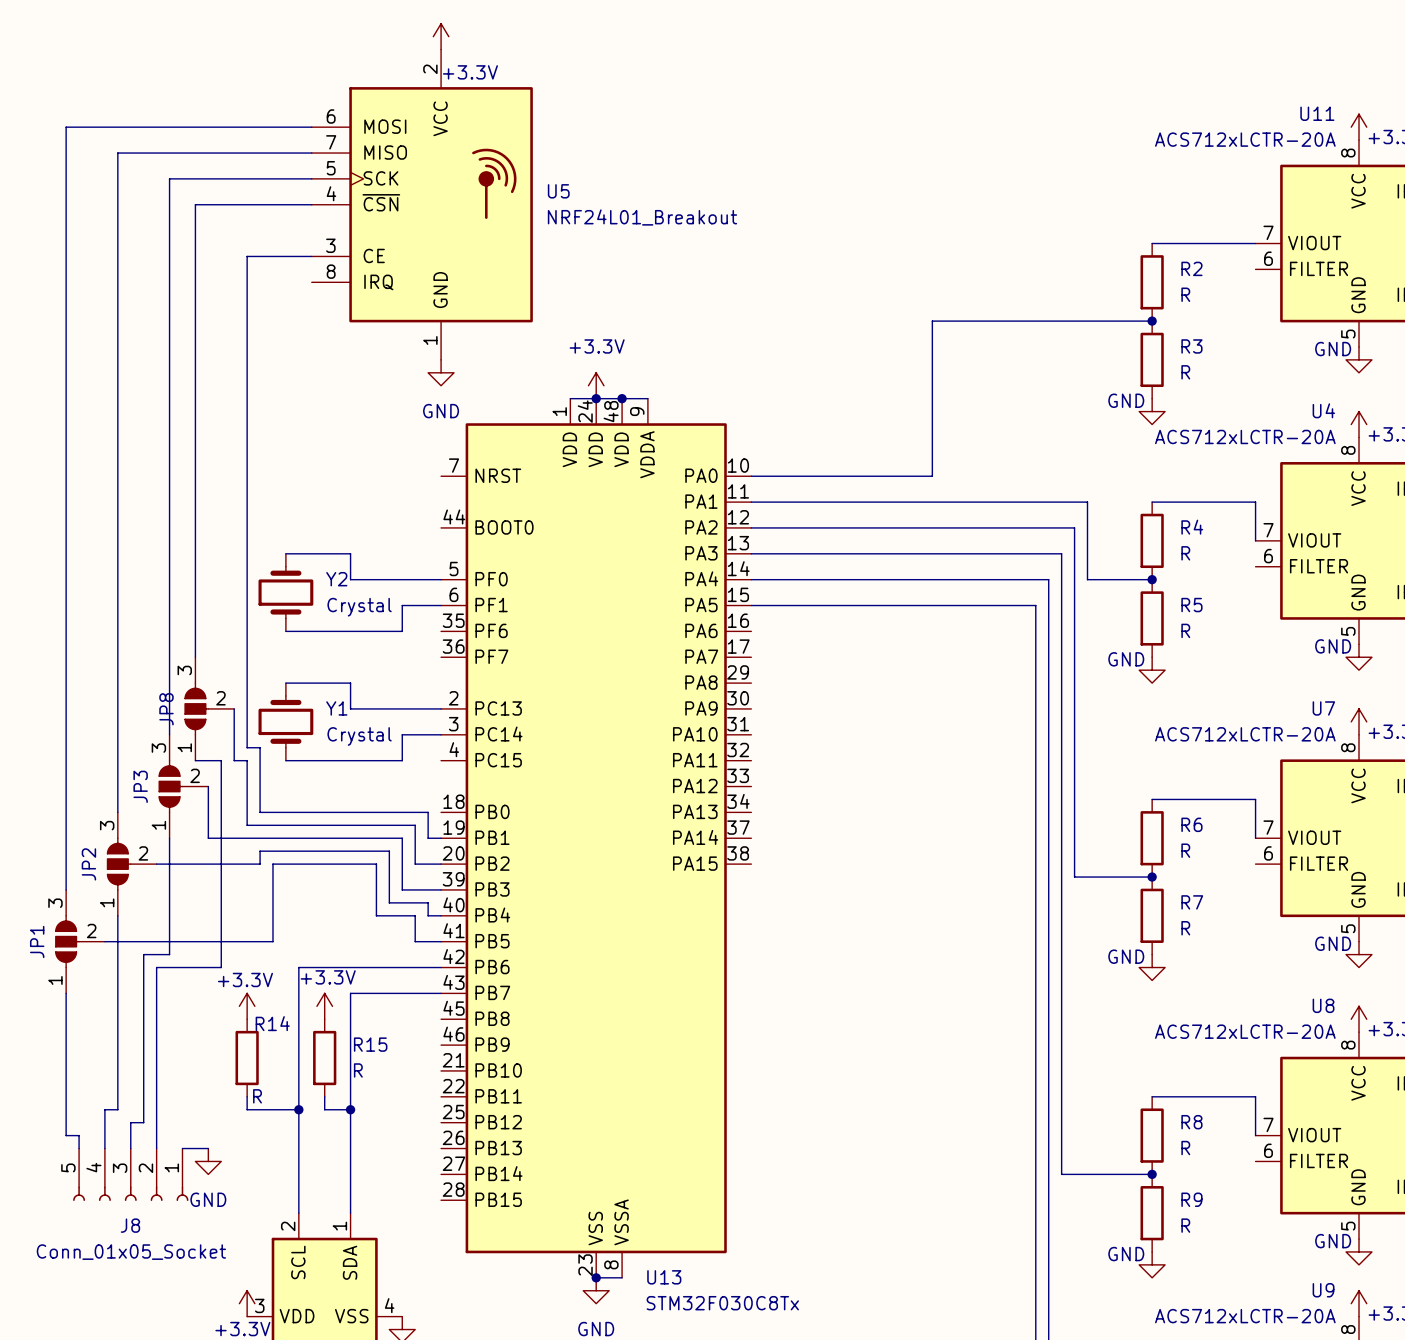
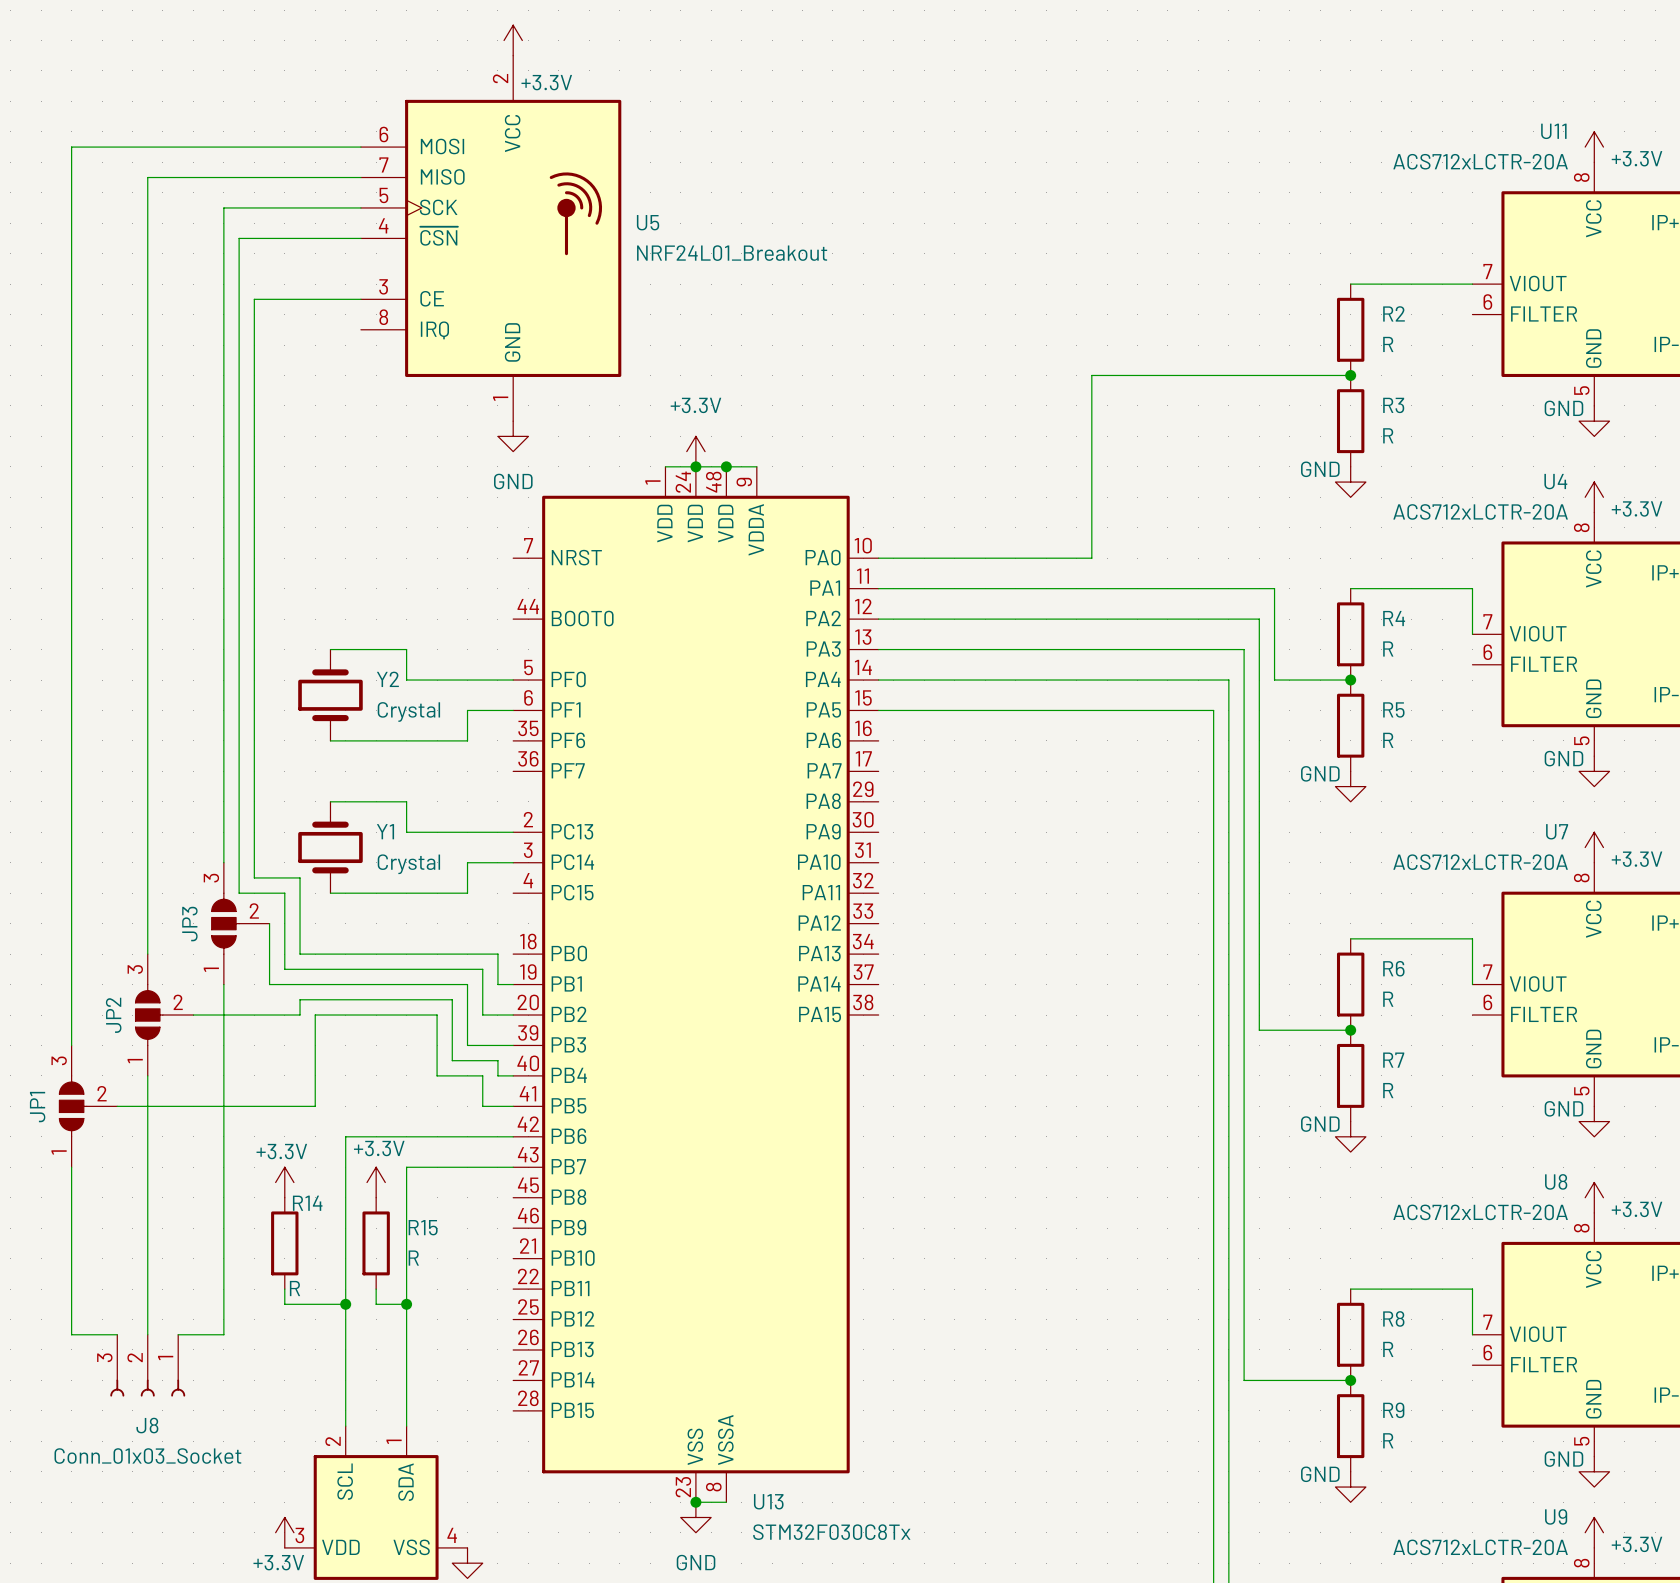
wire: (130, 153) (117, 153) (117, 812) -> (147, 177) (147, 954)
wire: (195, 178) (169, 178) (169, 734) -> none
wire: (195, 204) (208, 204) -> (223, 238) (223, 207)
wire: (247, 256) (247, 747) -> (284, 299) (254, 299) (254, 877) (284, 877)
JP8: (209, 708) -> none
wire: (234, 708) (234, 760) -> (254, 893) (269, 893)
wire: (195, 760) (208, 760) -> (239, 238) (239, 893)
wire: (221, 760) (221, 967) (156, 967) (156, 1148) -> none
JP3 position: (183, 786) -> (240, 923)
wire: (208, 786) (208, 838) (234, 838) -> (269, 923) (269, 984)
wire: (169, 838) (169, 954) (143, 954) (143, 1122) (130, 1122) -> (147, 1075) (147, 1319)
wire: none -> (223, 984) (223, 1334) (178, 1334)
JP2 position: (132, 864) -> (164, 1015)
wire: (117, 915) (117, 1109) (104, 1109) (104, 1148) -> none
wire: (79, 1135) (79, 1148) -> (86, 1334) (117, 1334)
J8 symbol: [73, 1148, 189, 1202] -> [110, 1334, 186, 1397]
wire: (182, 1148) (208, 1148) -> none
power symbol: GND (208, 1161) -> none
J8 value: Conn_01x05_Socket (131, 1252) -> Conn_01x03_Socket (147, 1456)

